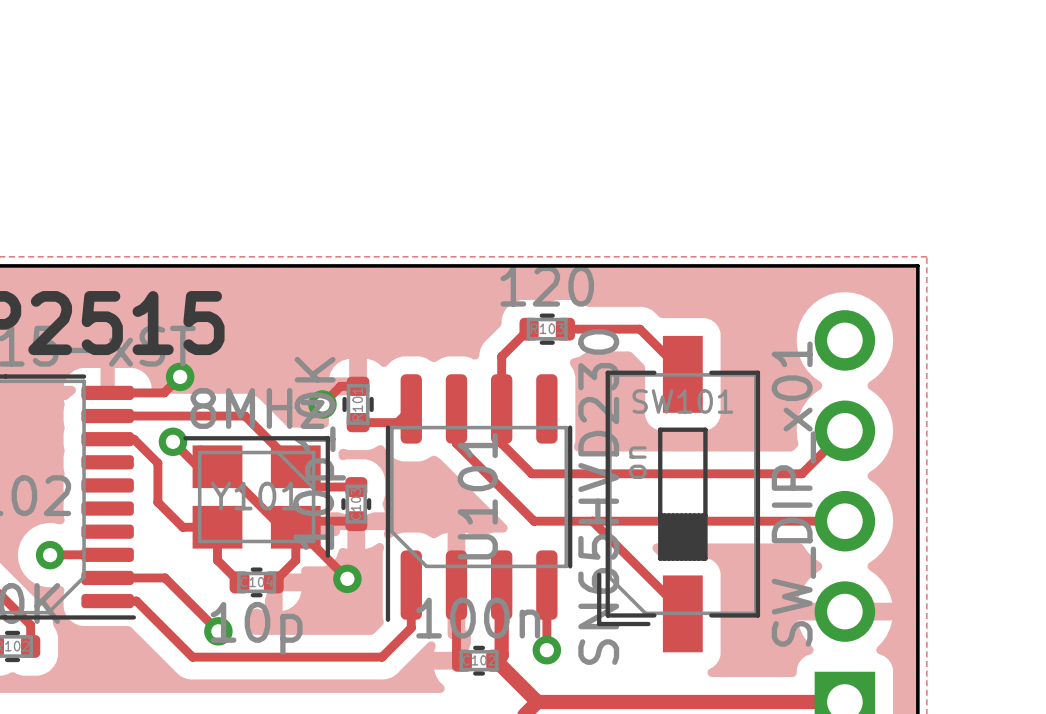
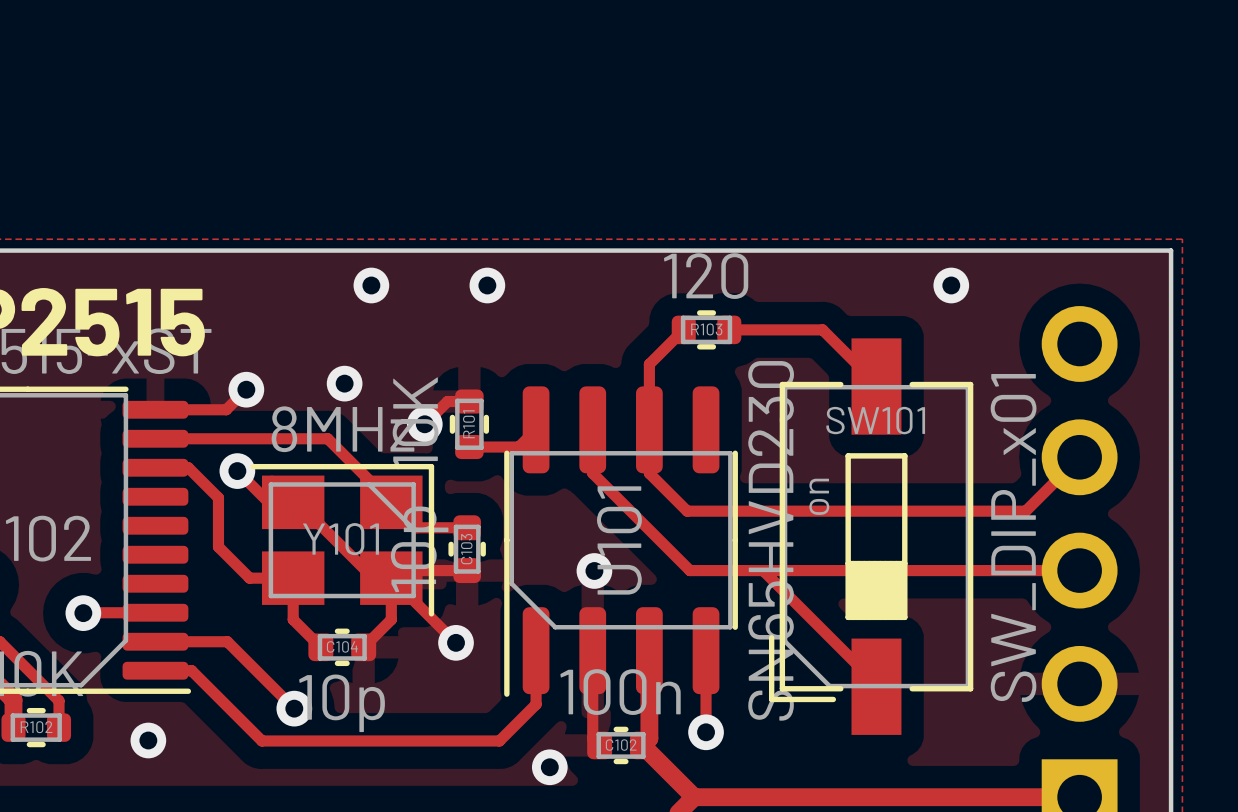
via: none -> (371, 285)
via: none -> (487, 285)
via: none -> (951, 285)
via: none -> (344, 383)
via: none -> (594, 570)
via: none -> (148, 740)
via: none -> (549, 767)

